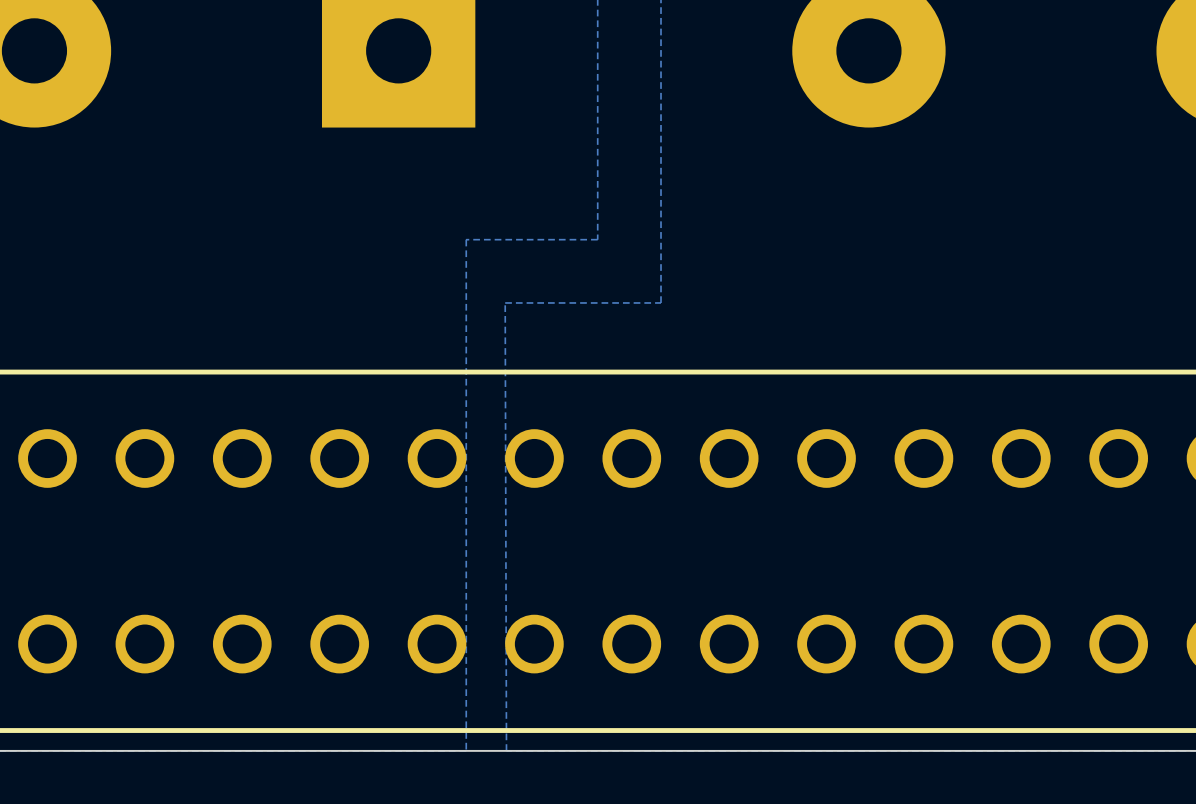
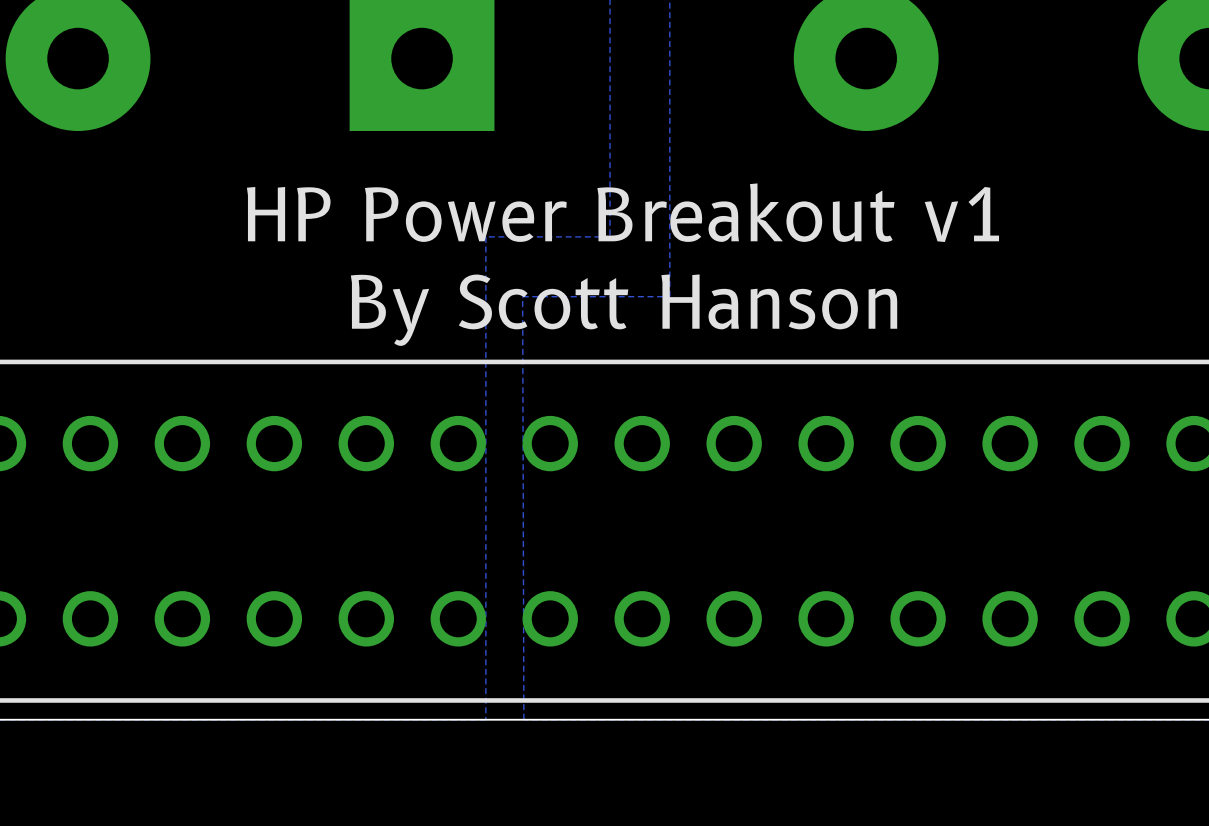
text: none -> HP Power Breakout v1 (622, 212)
text: none -> By Scott Hanson (624, 310)

